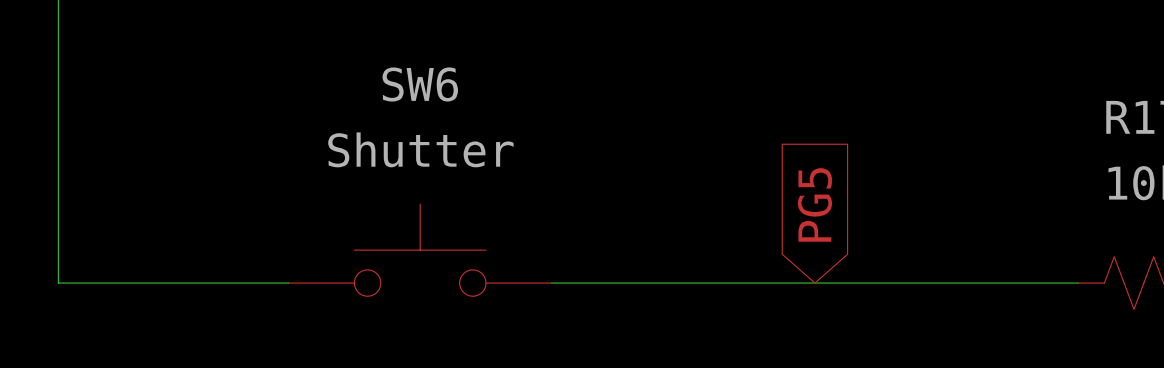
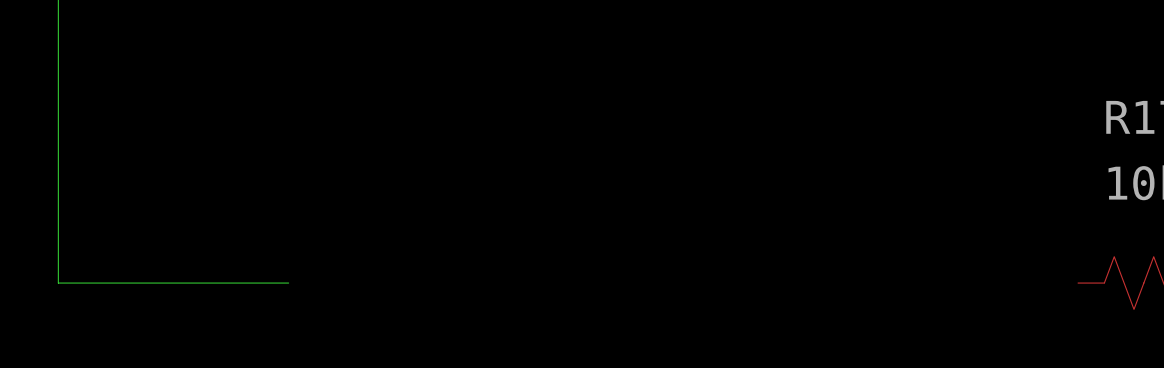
global label: PG5 (814, 204) -> none
SW6: Shutter (420, 250) -> none
wire: (551, 283) (1078, 283) -> none

